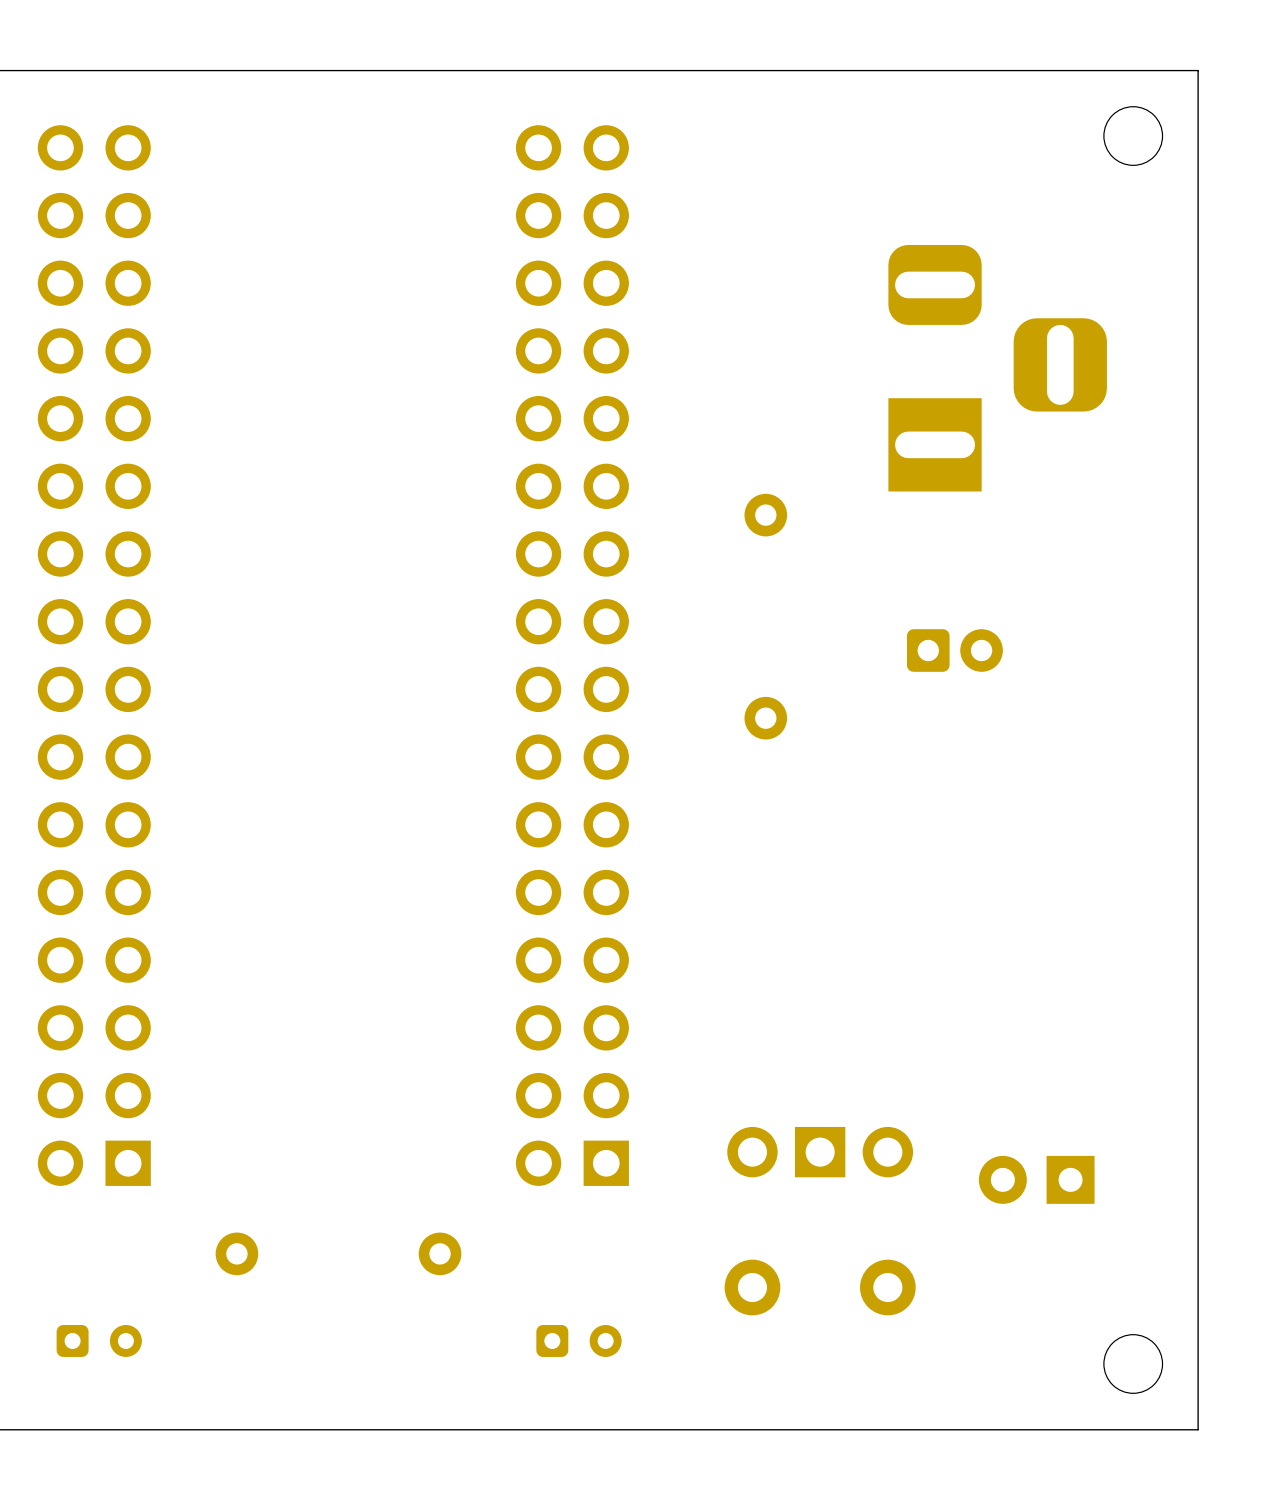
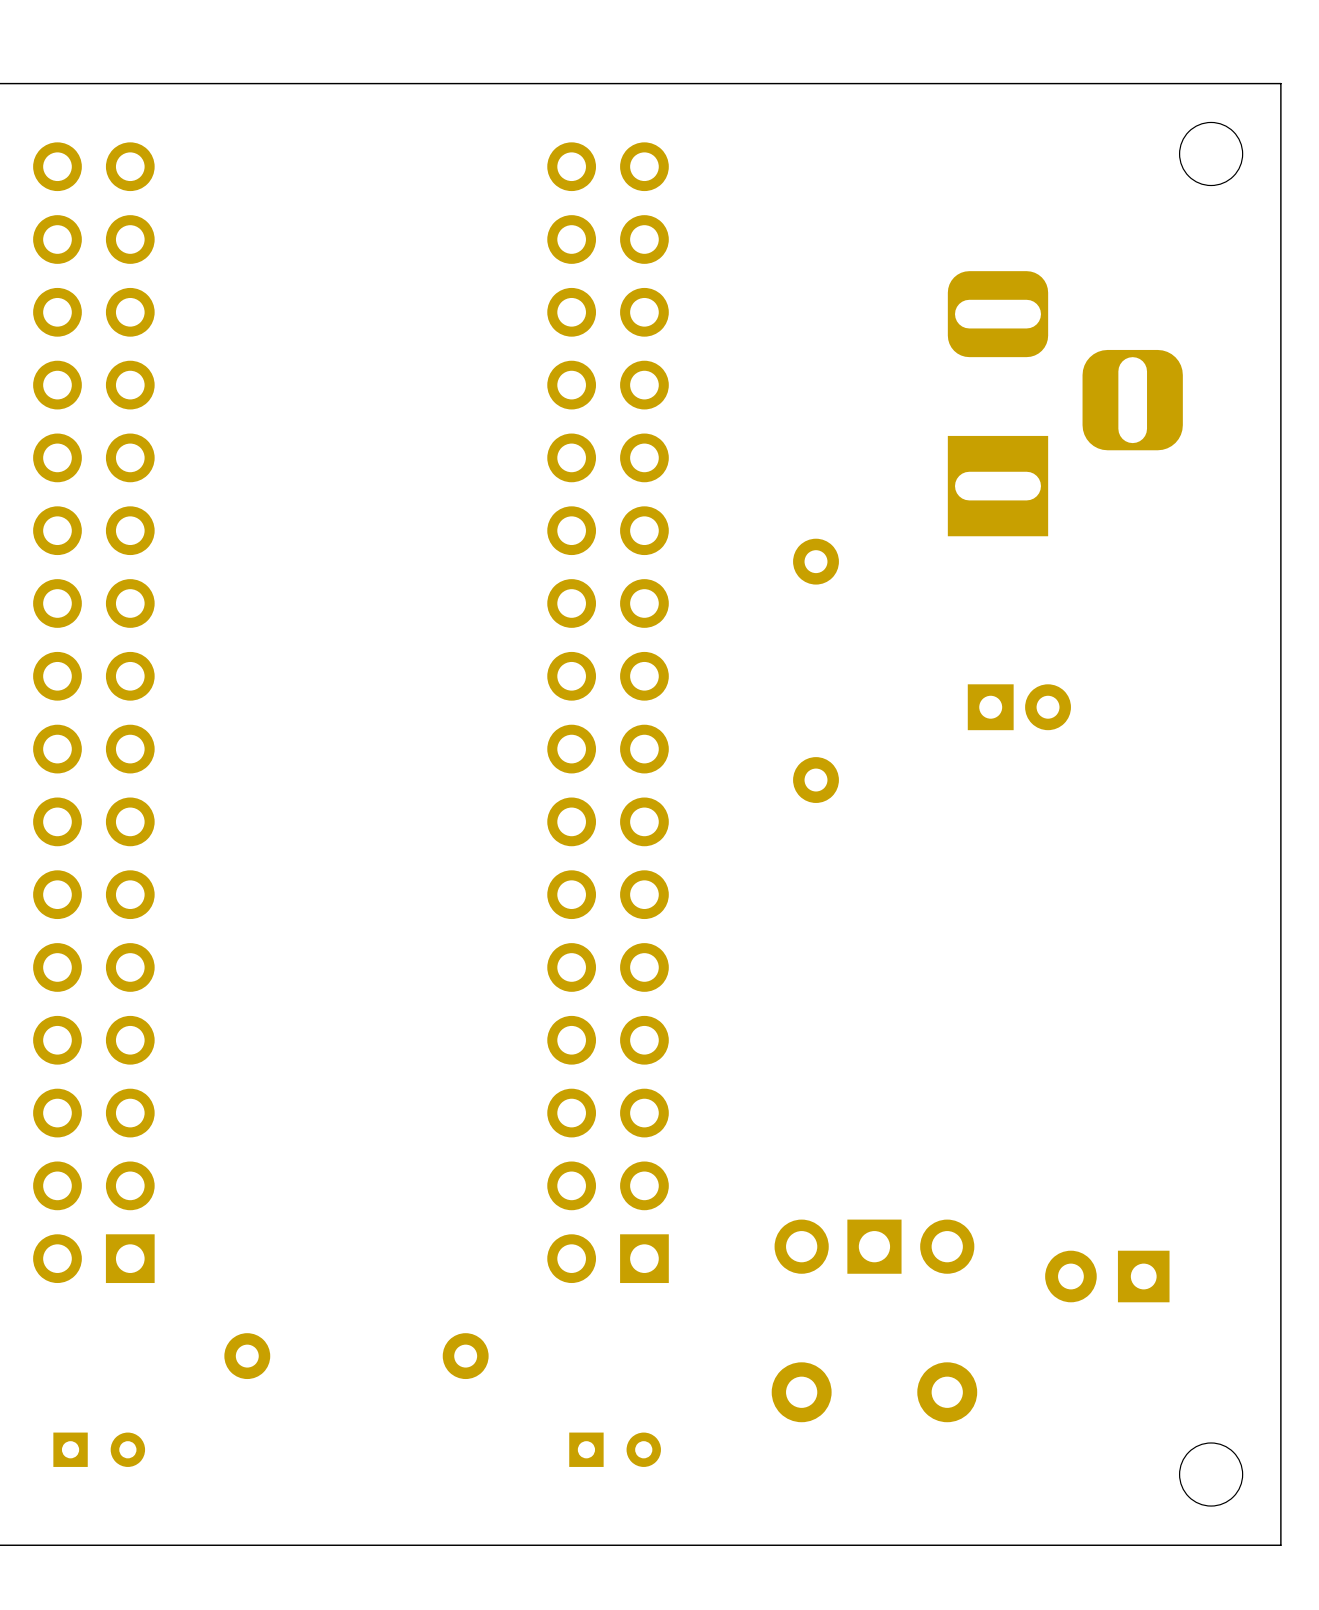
part footprint: [906, 629, 1003, 672] -> [967, 684, 1071, 731]
part footprint: [56, 1324, 142, 1357] -> [53, 1432, 146, 1467]
part footprint: [536, 1324, 622, 1357] -> [569, 1432, 661, 1467]

